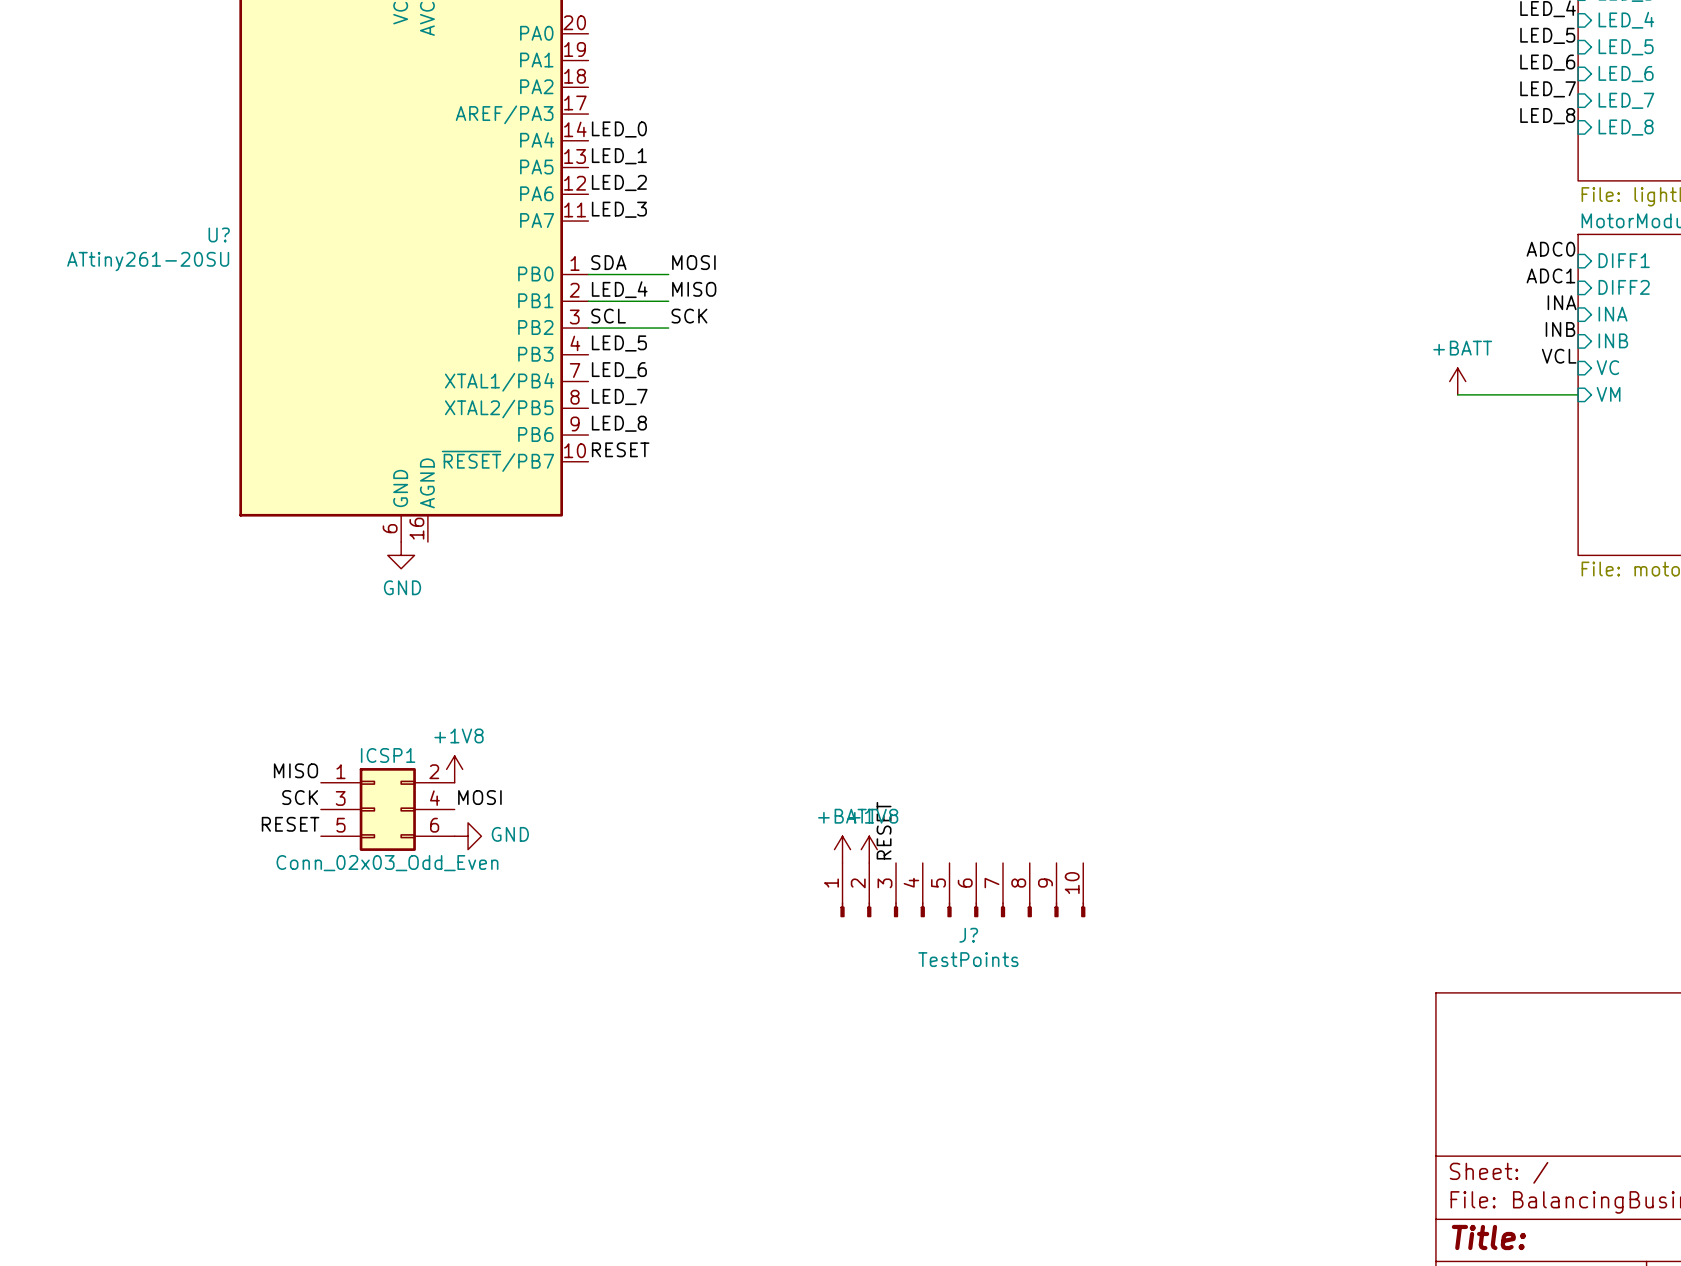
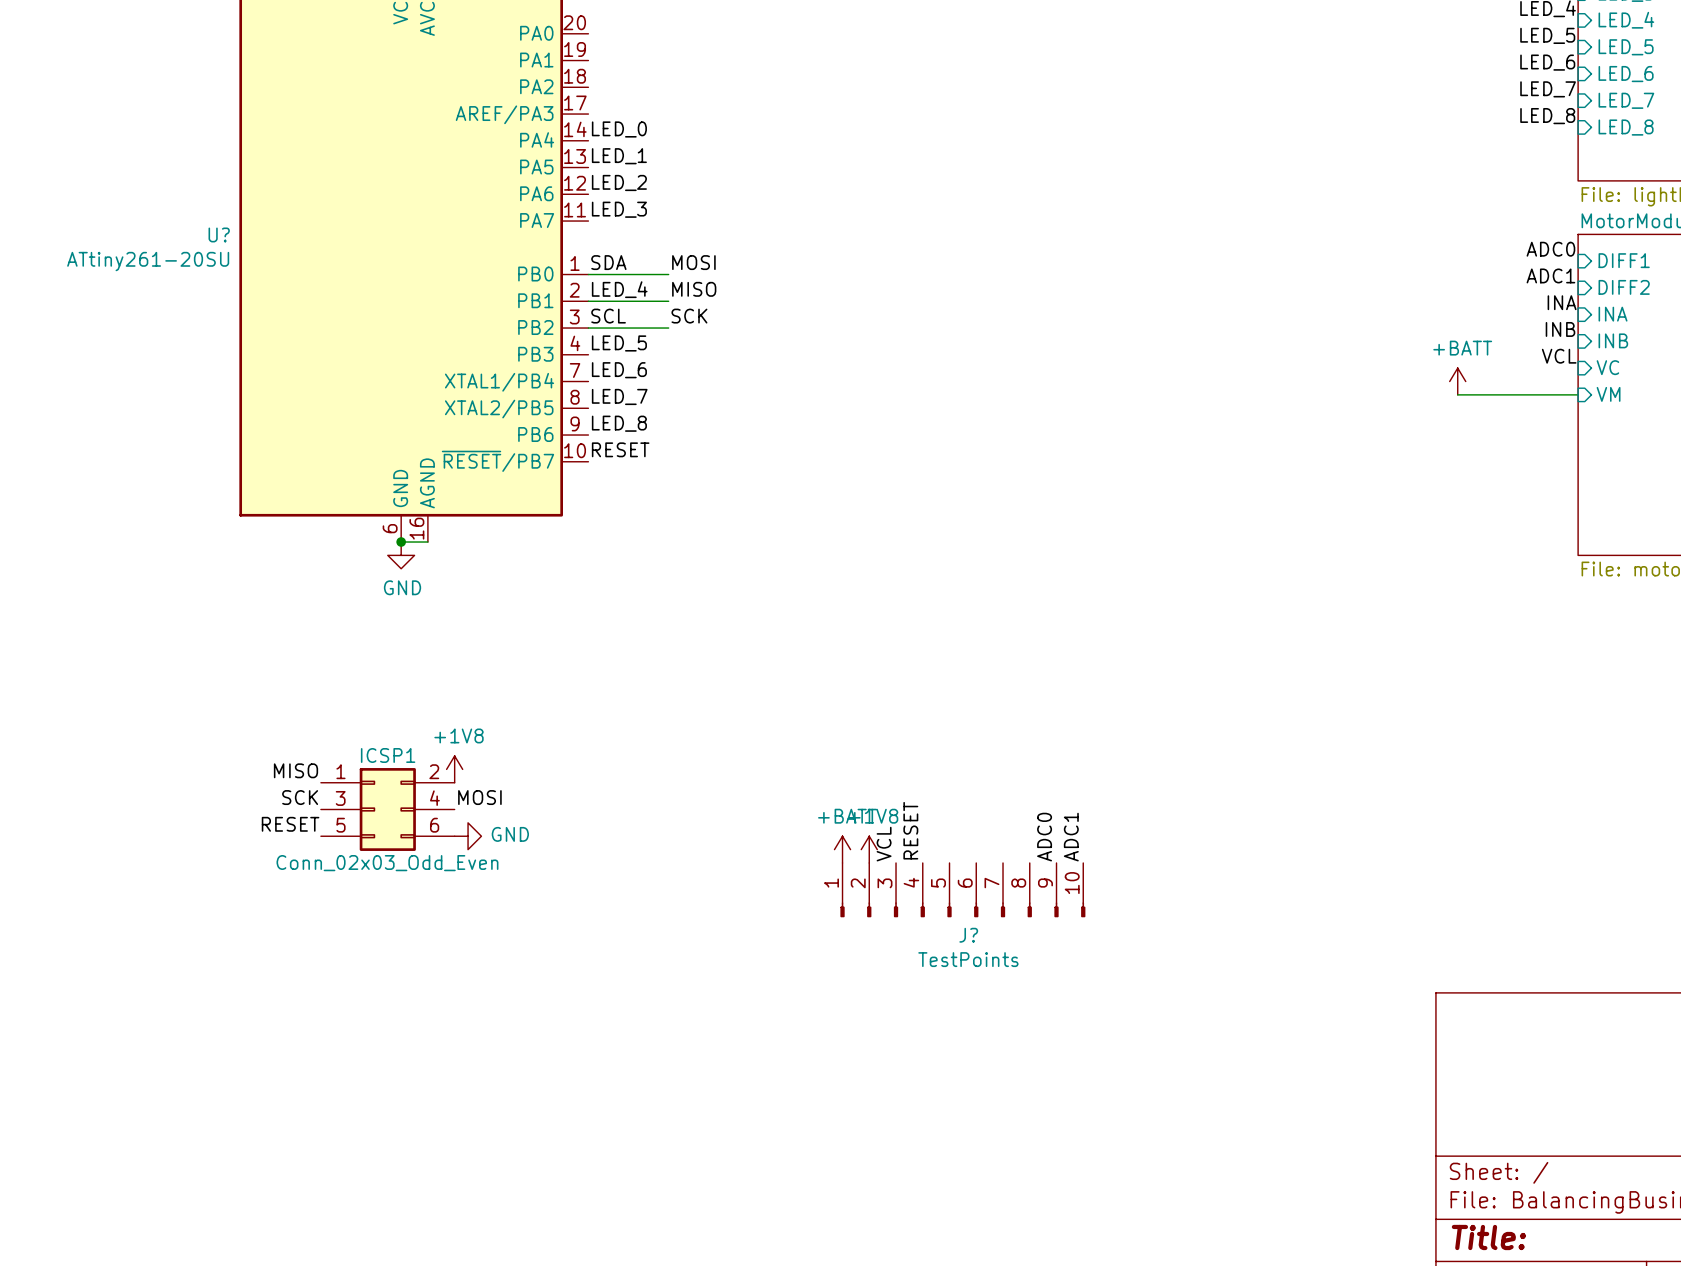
wire: none -> (401, 542) (427, 542)
junction: none -> (401, 542)
label: RESET (884, 830) -> VCL (884, 844)
label: none -> RESET (910, 830)
label: none -> ADC0 (1044, 837)
label: none -> ADC1 (1071, 837)

